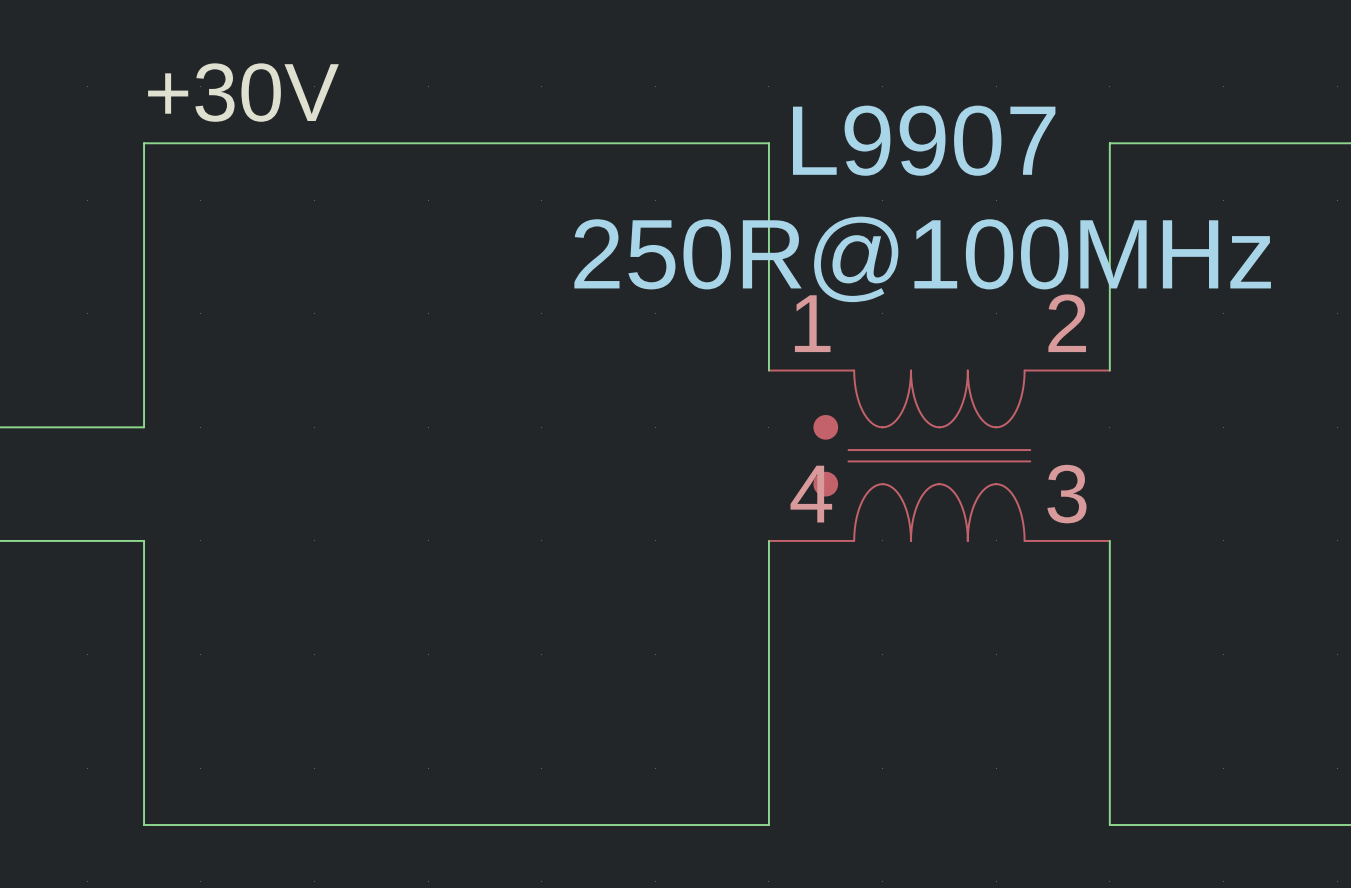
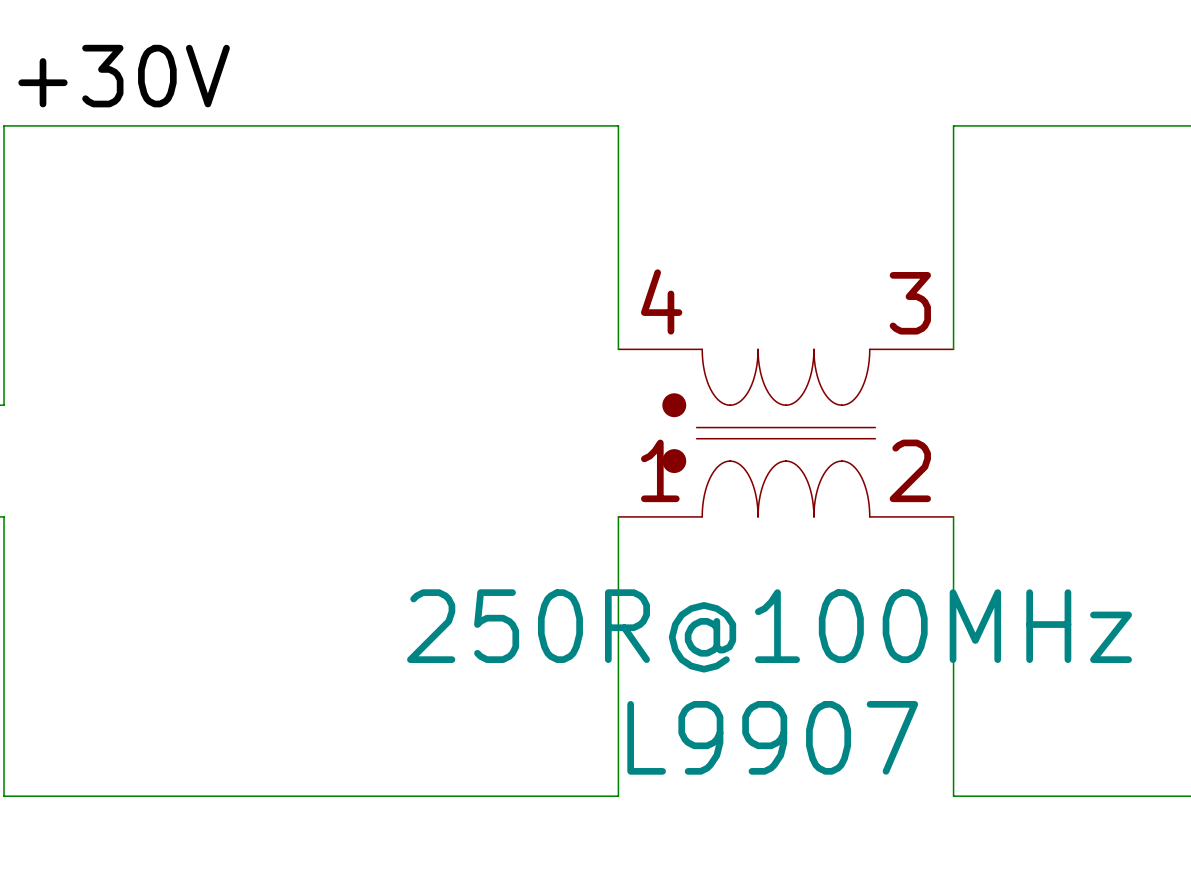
L9907 flip: as is (922, 455) -> up-down (769, 433)

